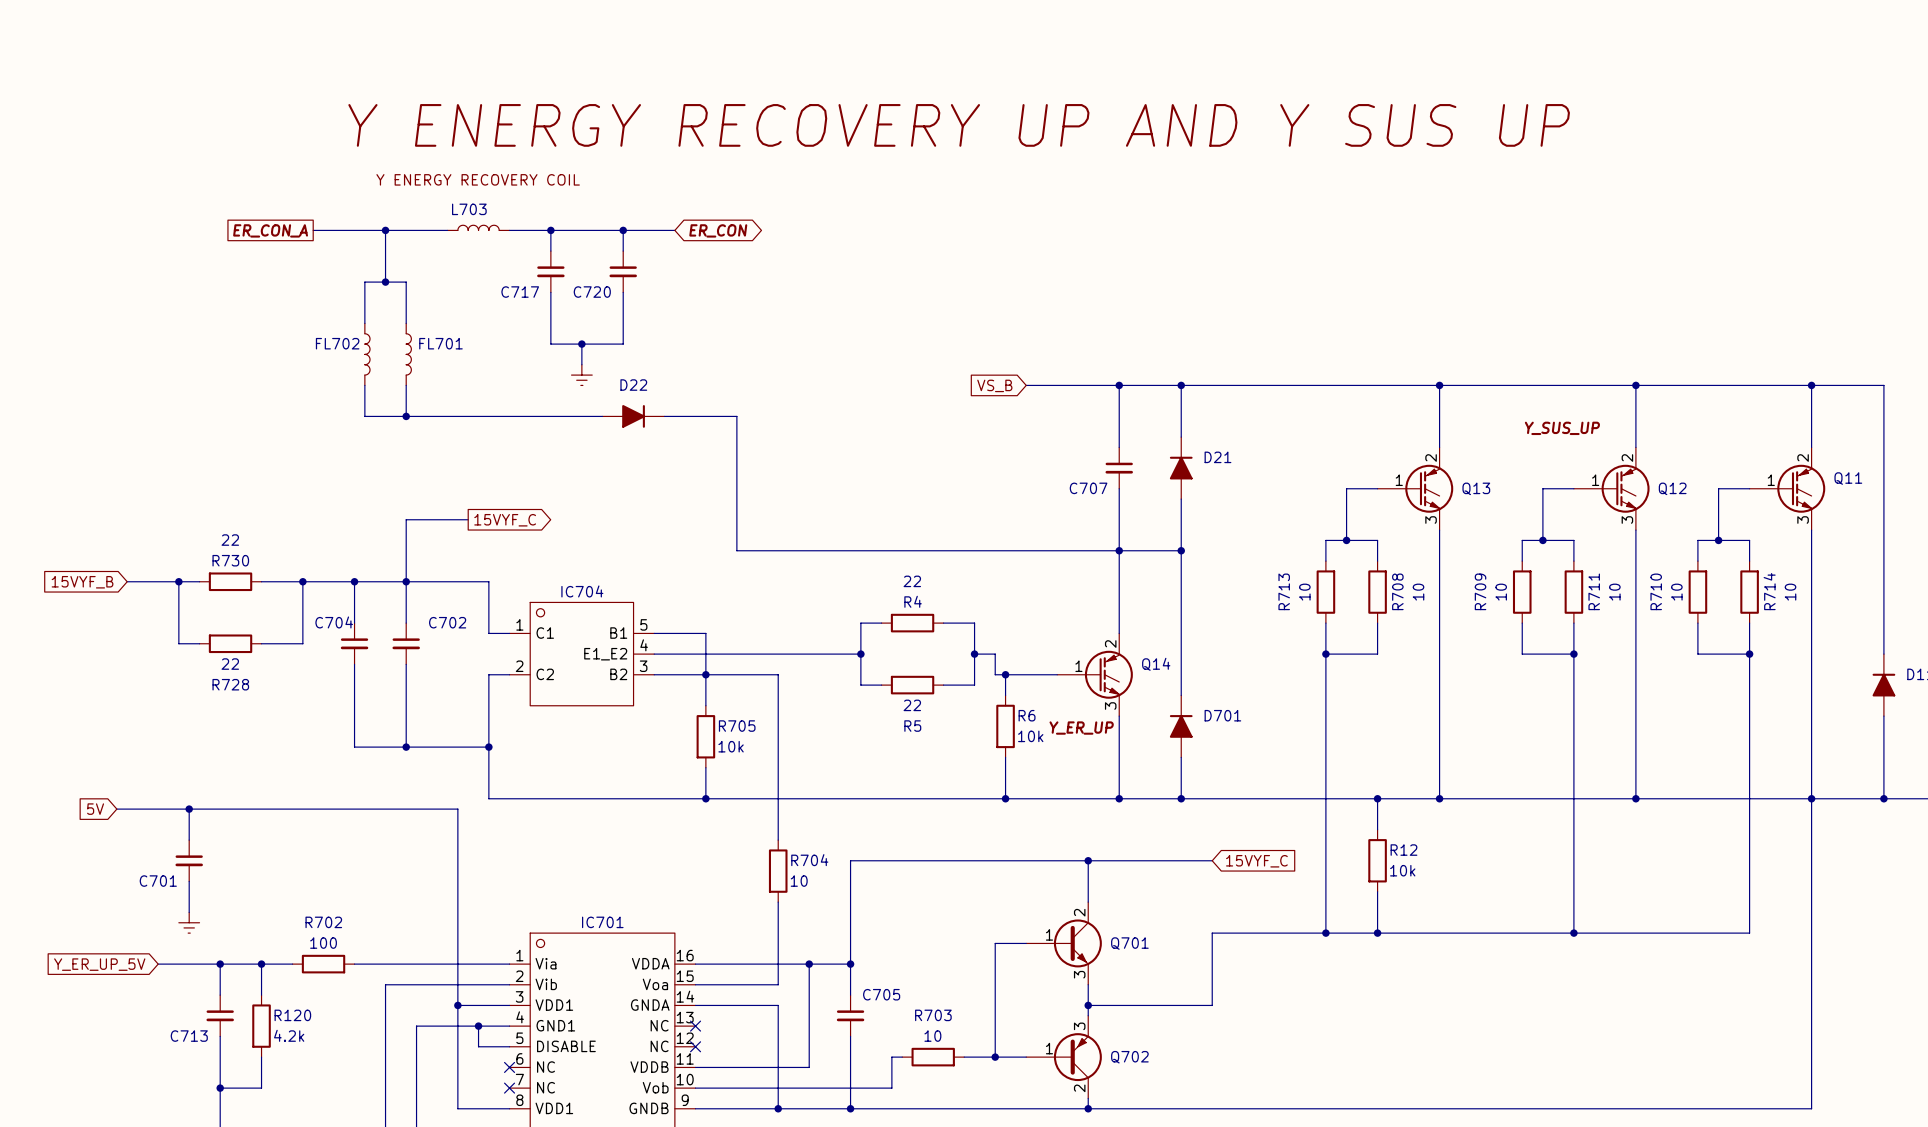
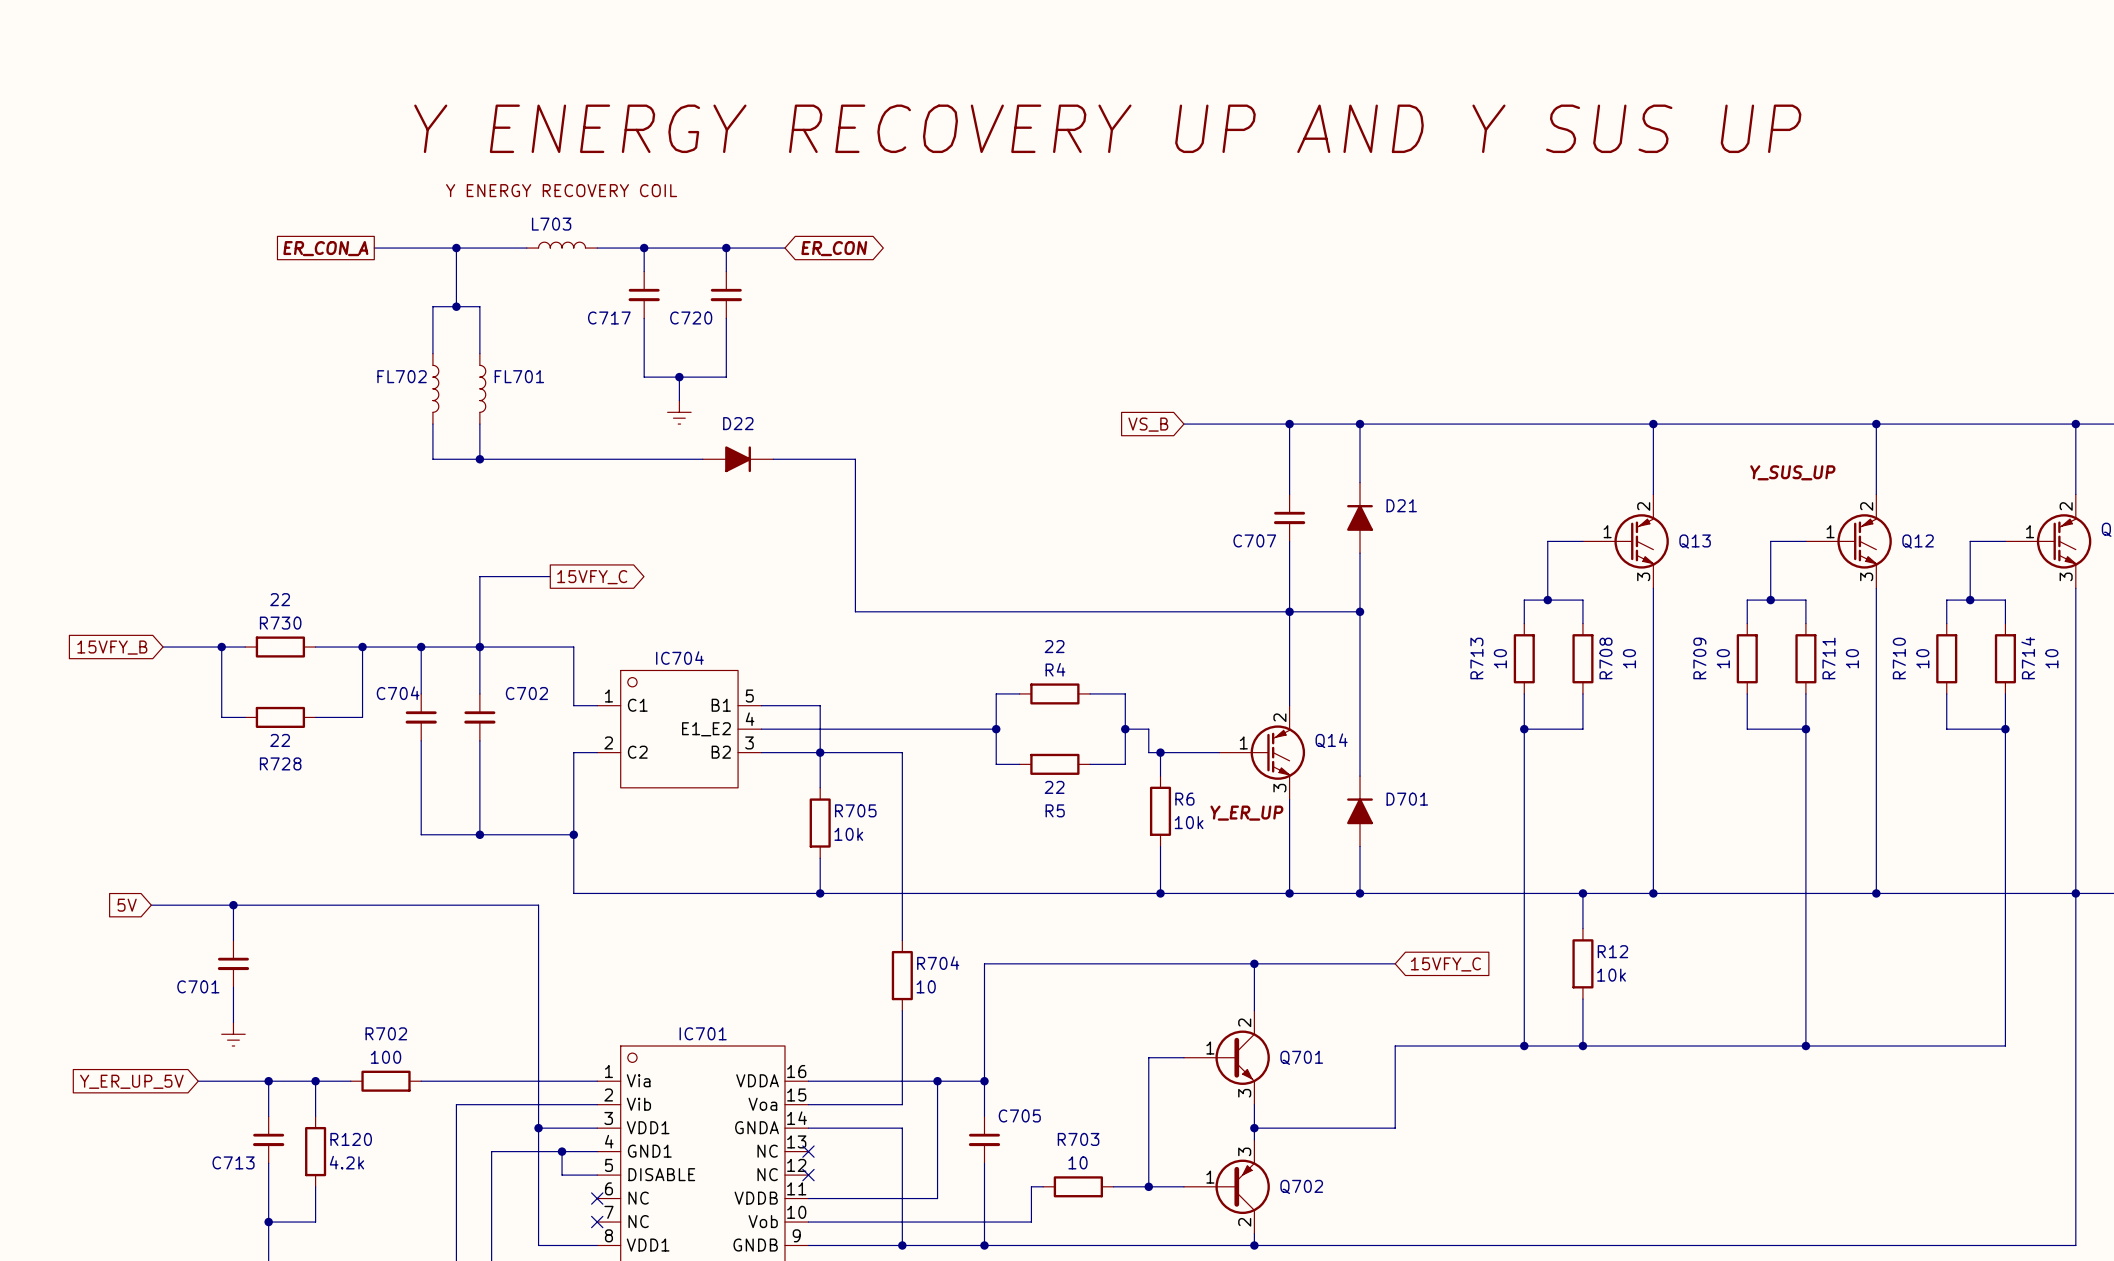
global label: 15VYF_C (505, 520) -> 15VFY_C (592, 577)
global label: 15VYF_B (82, 582) -> 15VFY_B (112, 647)
global label: 15VYF_C (1256, 861) -> 15VFY_C (1445, 964)

